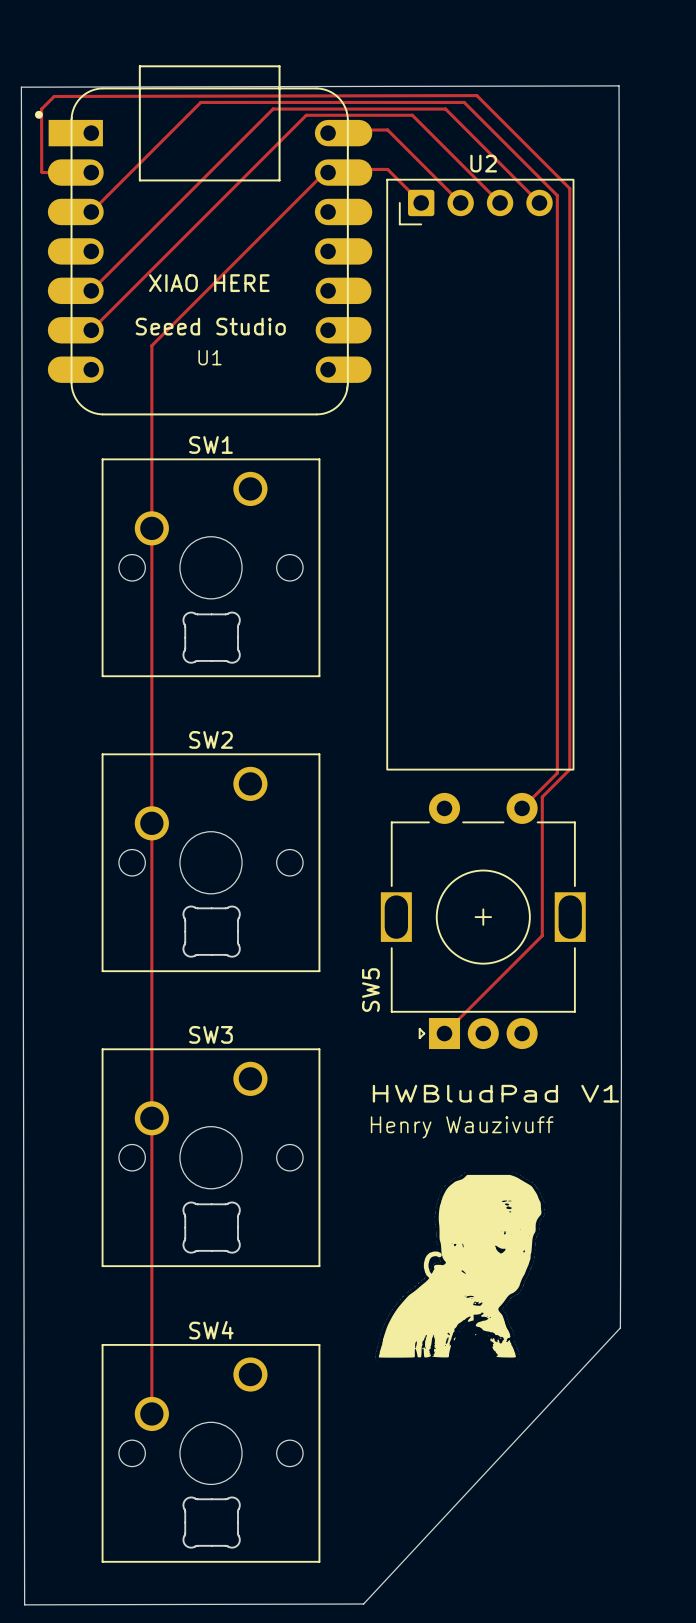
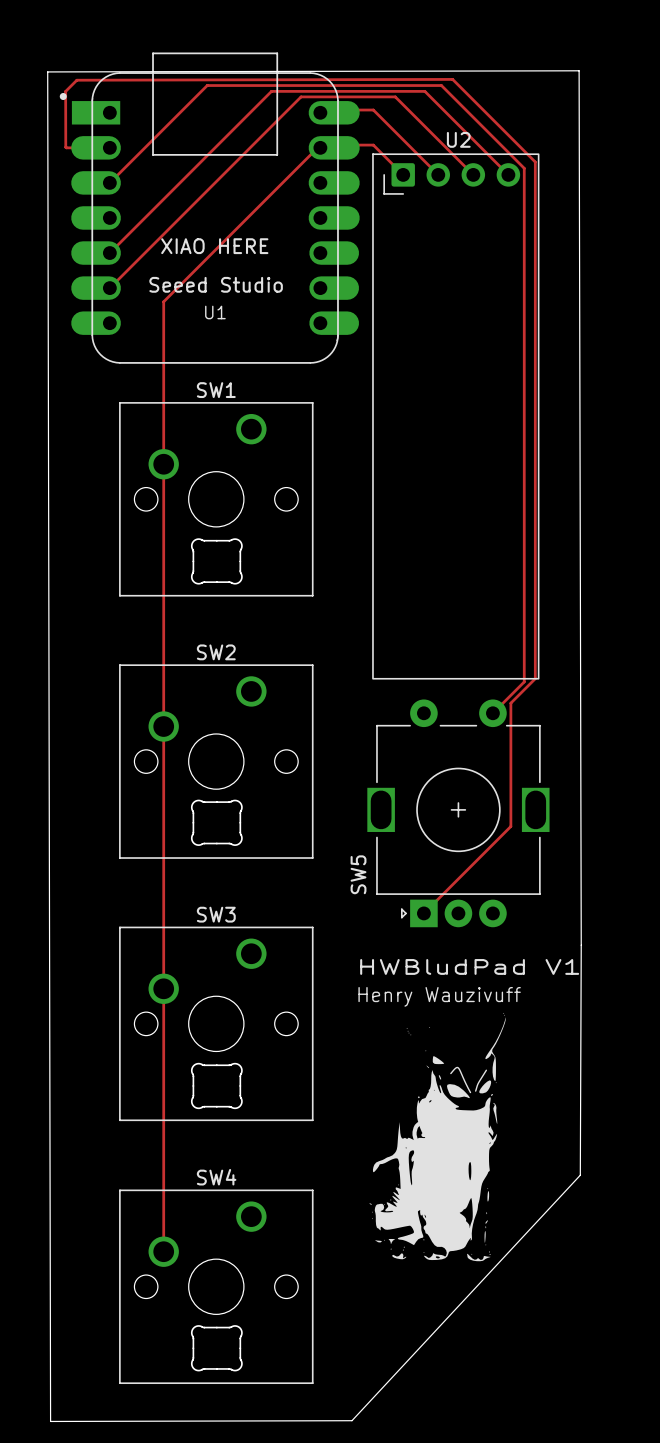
line: none -> (486, 1070) (475, 1091)
line: none -> (450, 1073) (456, 1067) (458, 1068) (470, 1092)
part: (460, 1266) -> none
part: none -> (437, 1137)

